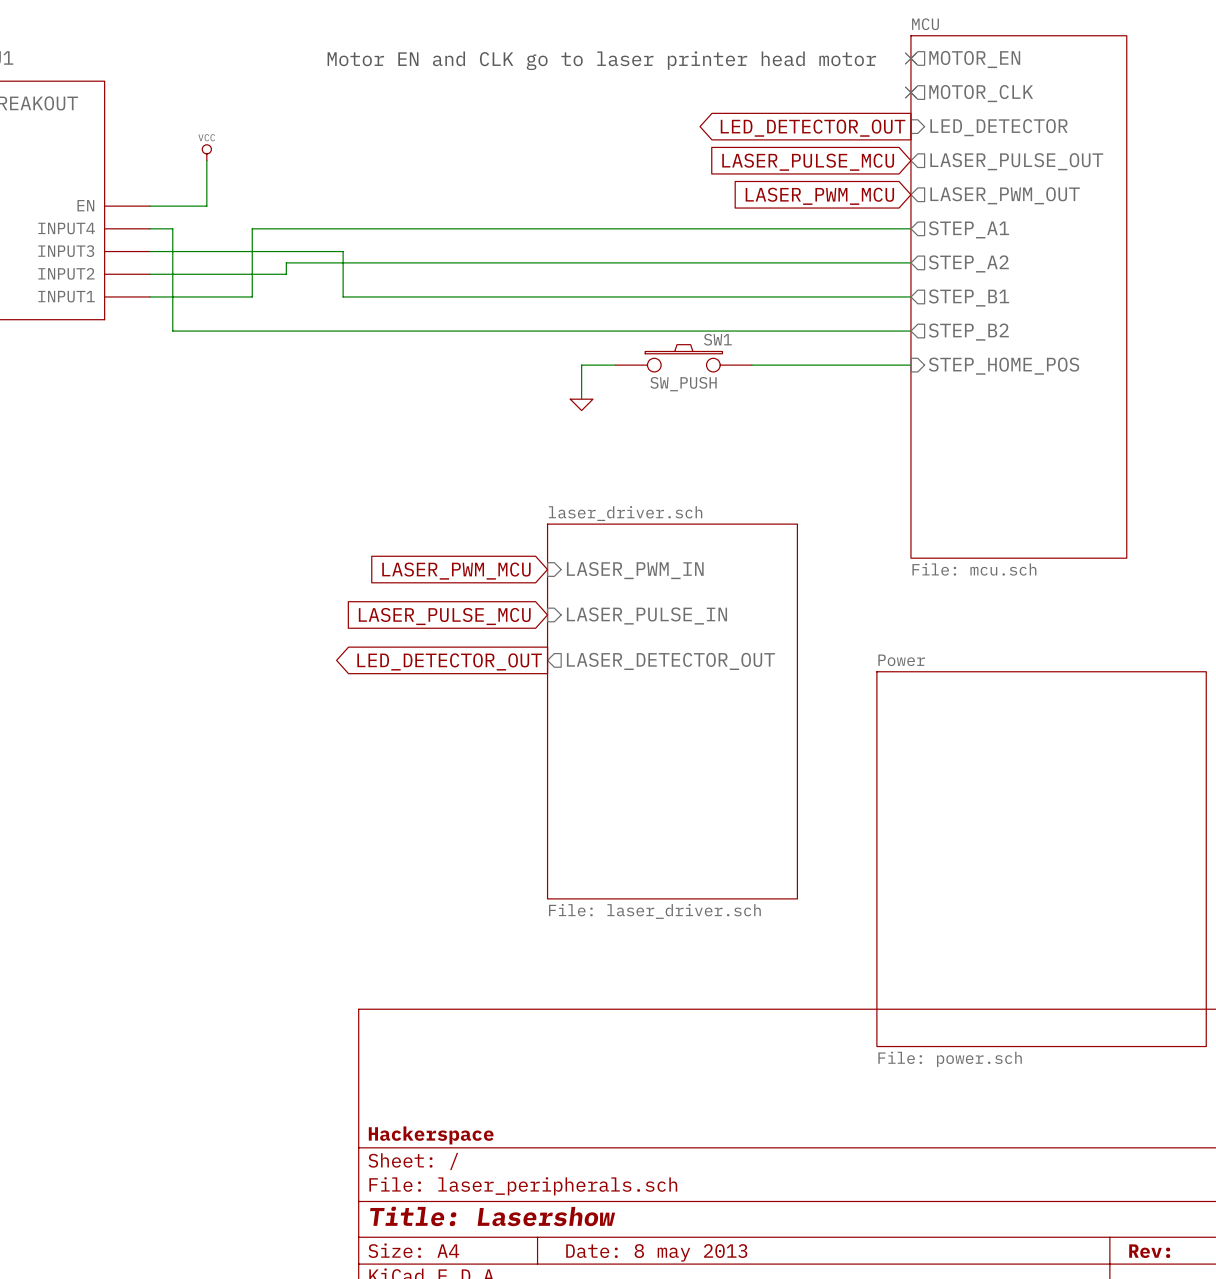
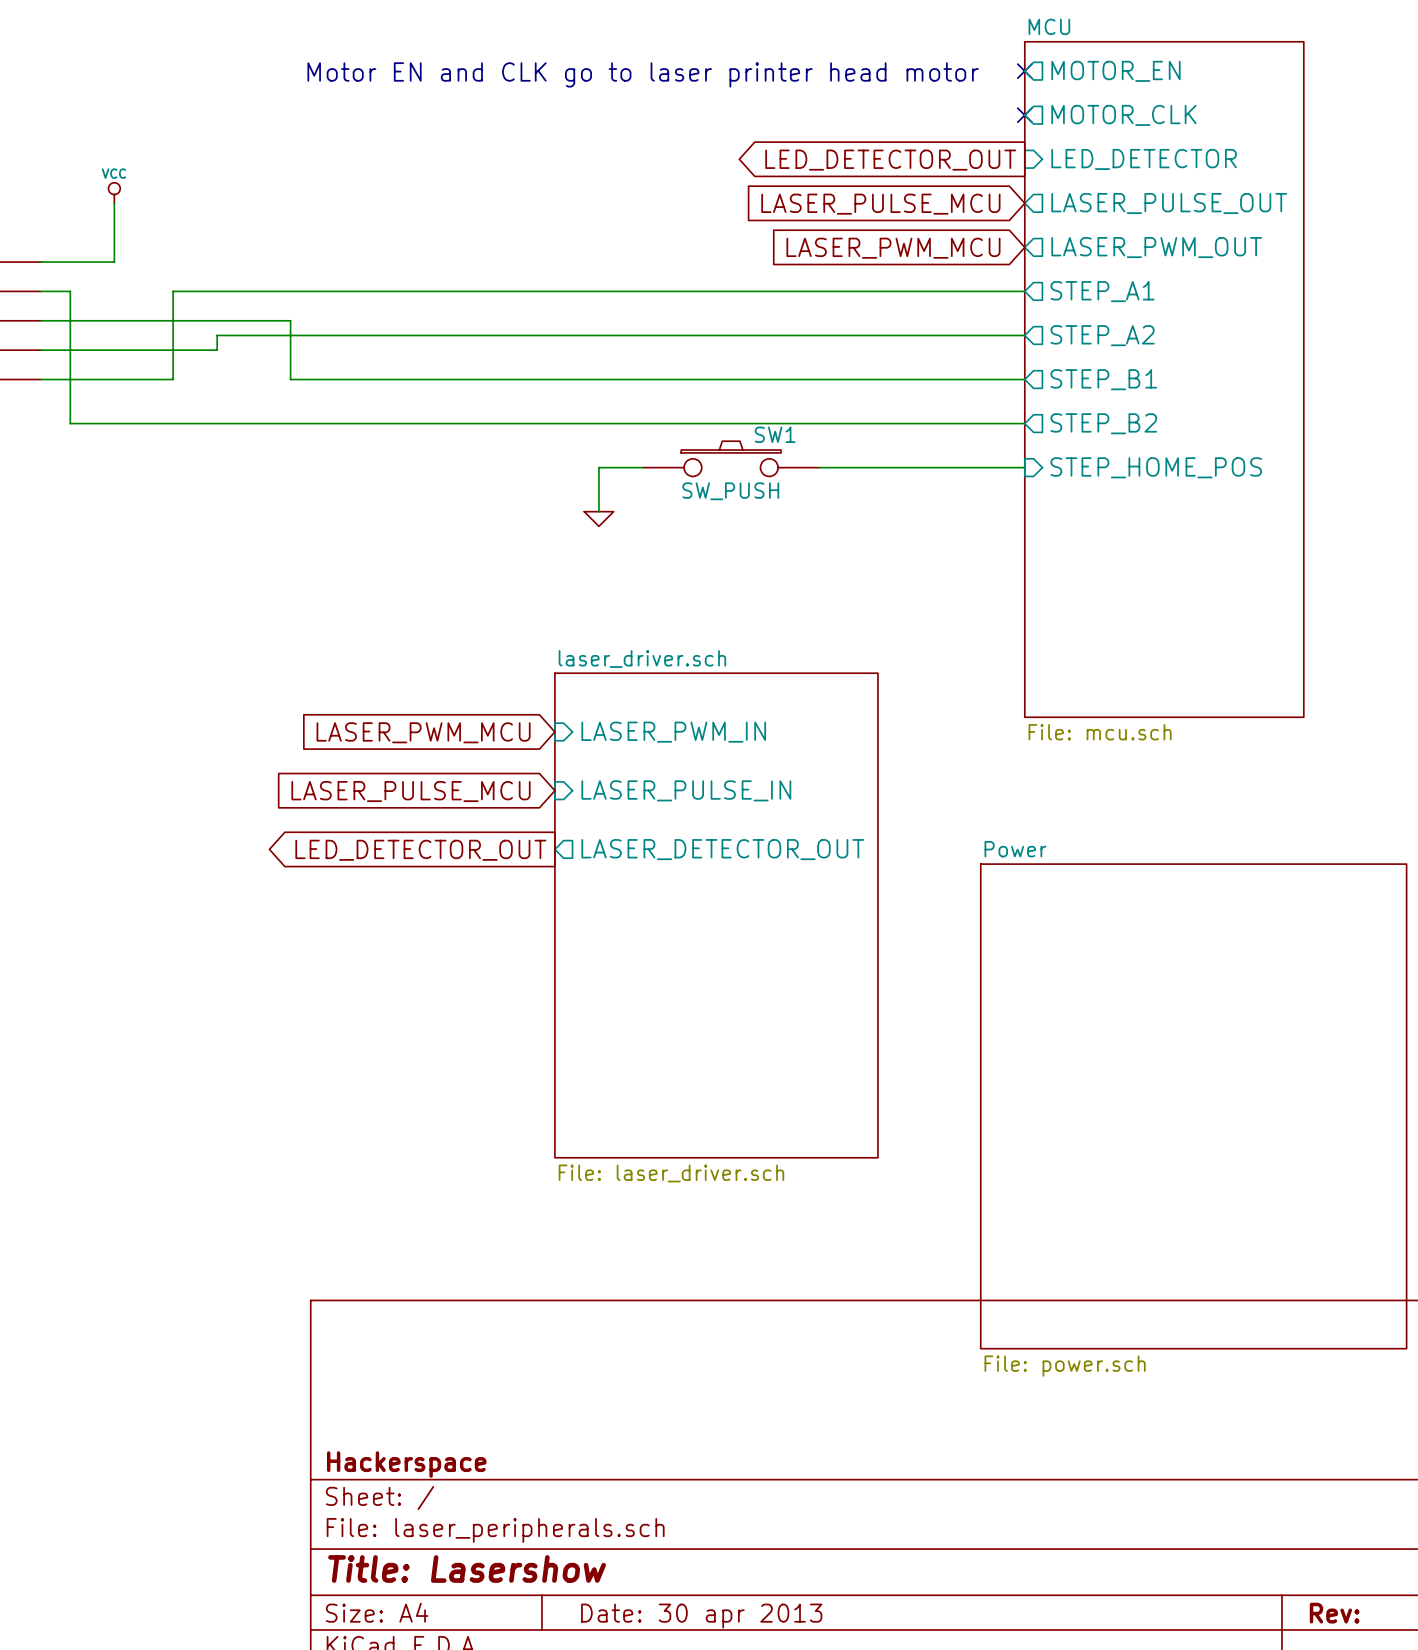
title block: Date: 8 may 2013 (656, 1252) -> Date: 30 apr 2013 (701, 1616)

